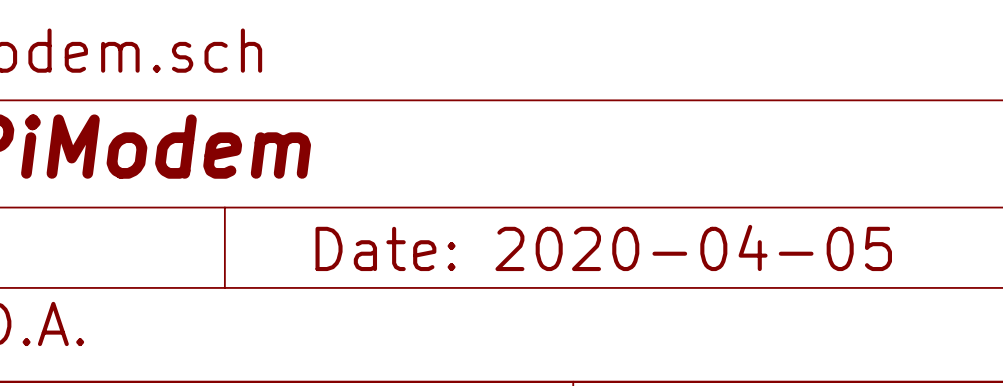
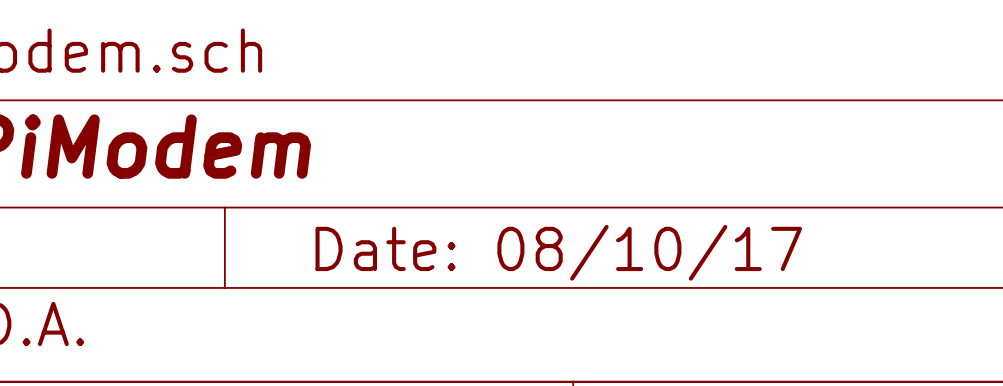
title block: Date: 2020-04-05 (603, 247) -> Date: 08/10/17 (558, 252)

